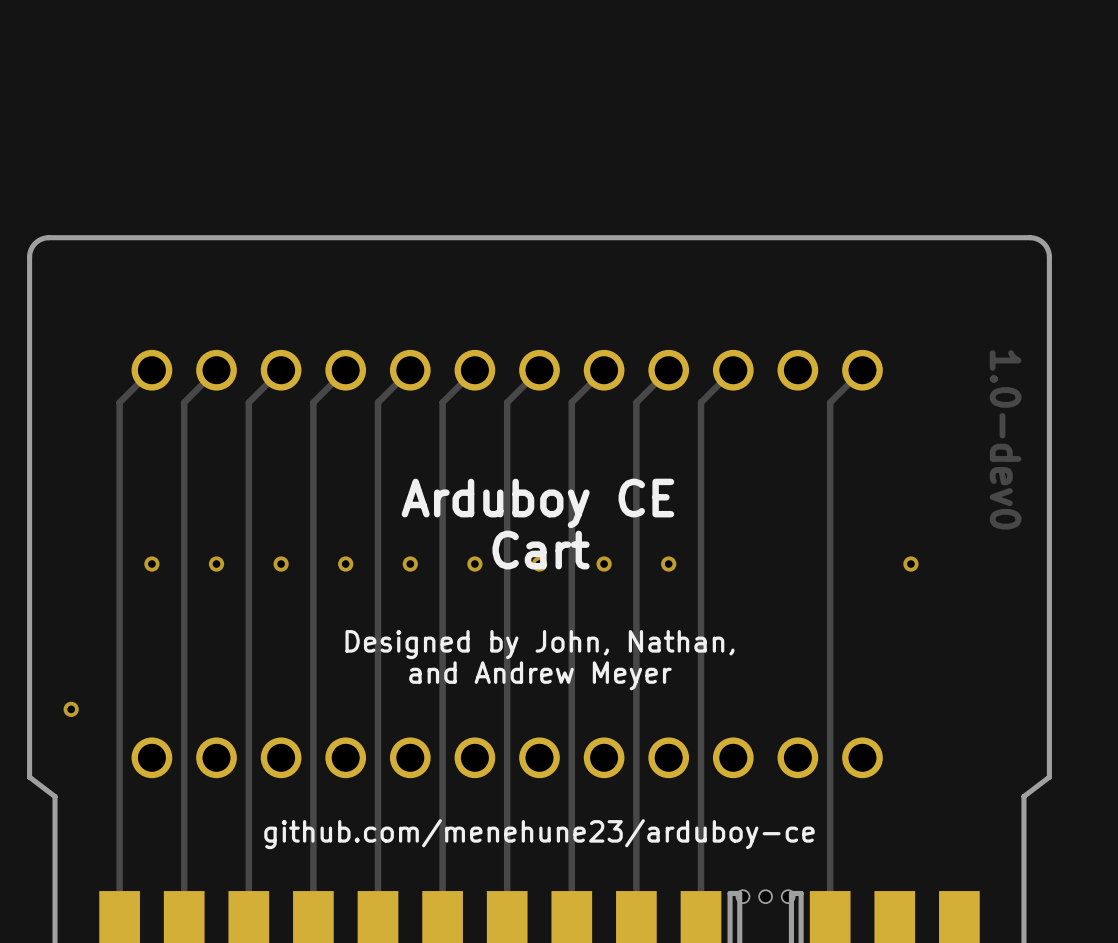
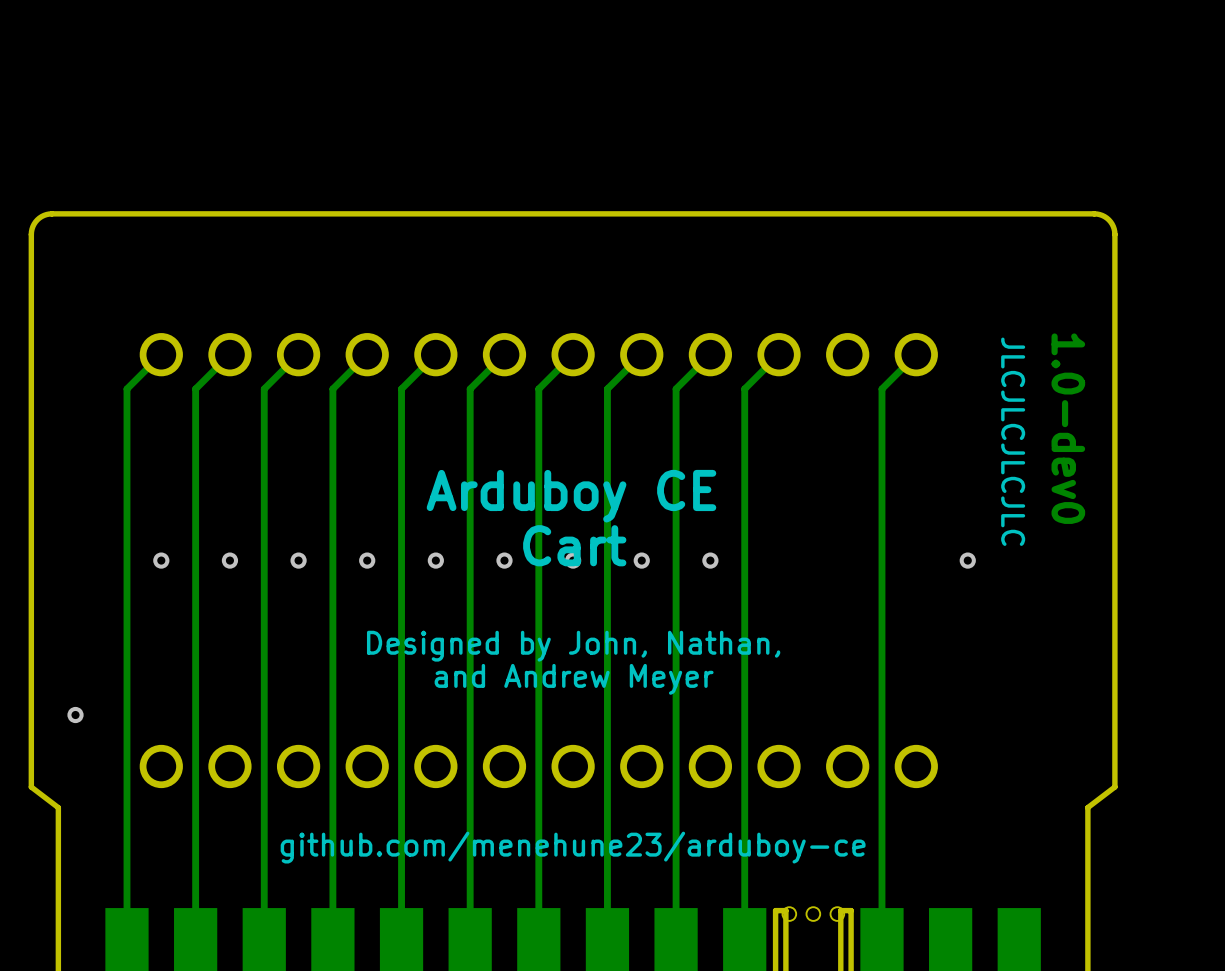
text: none -> JLCJLCJLCJLC (1013, 441)

